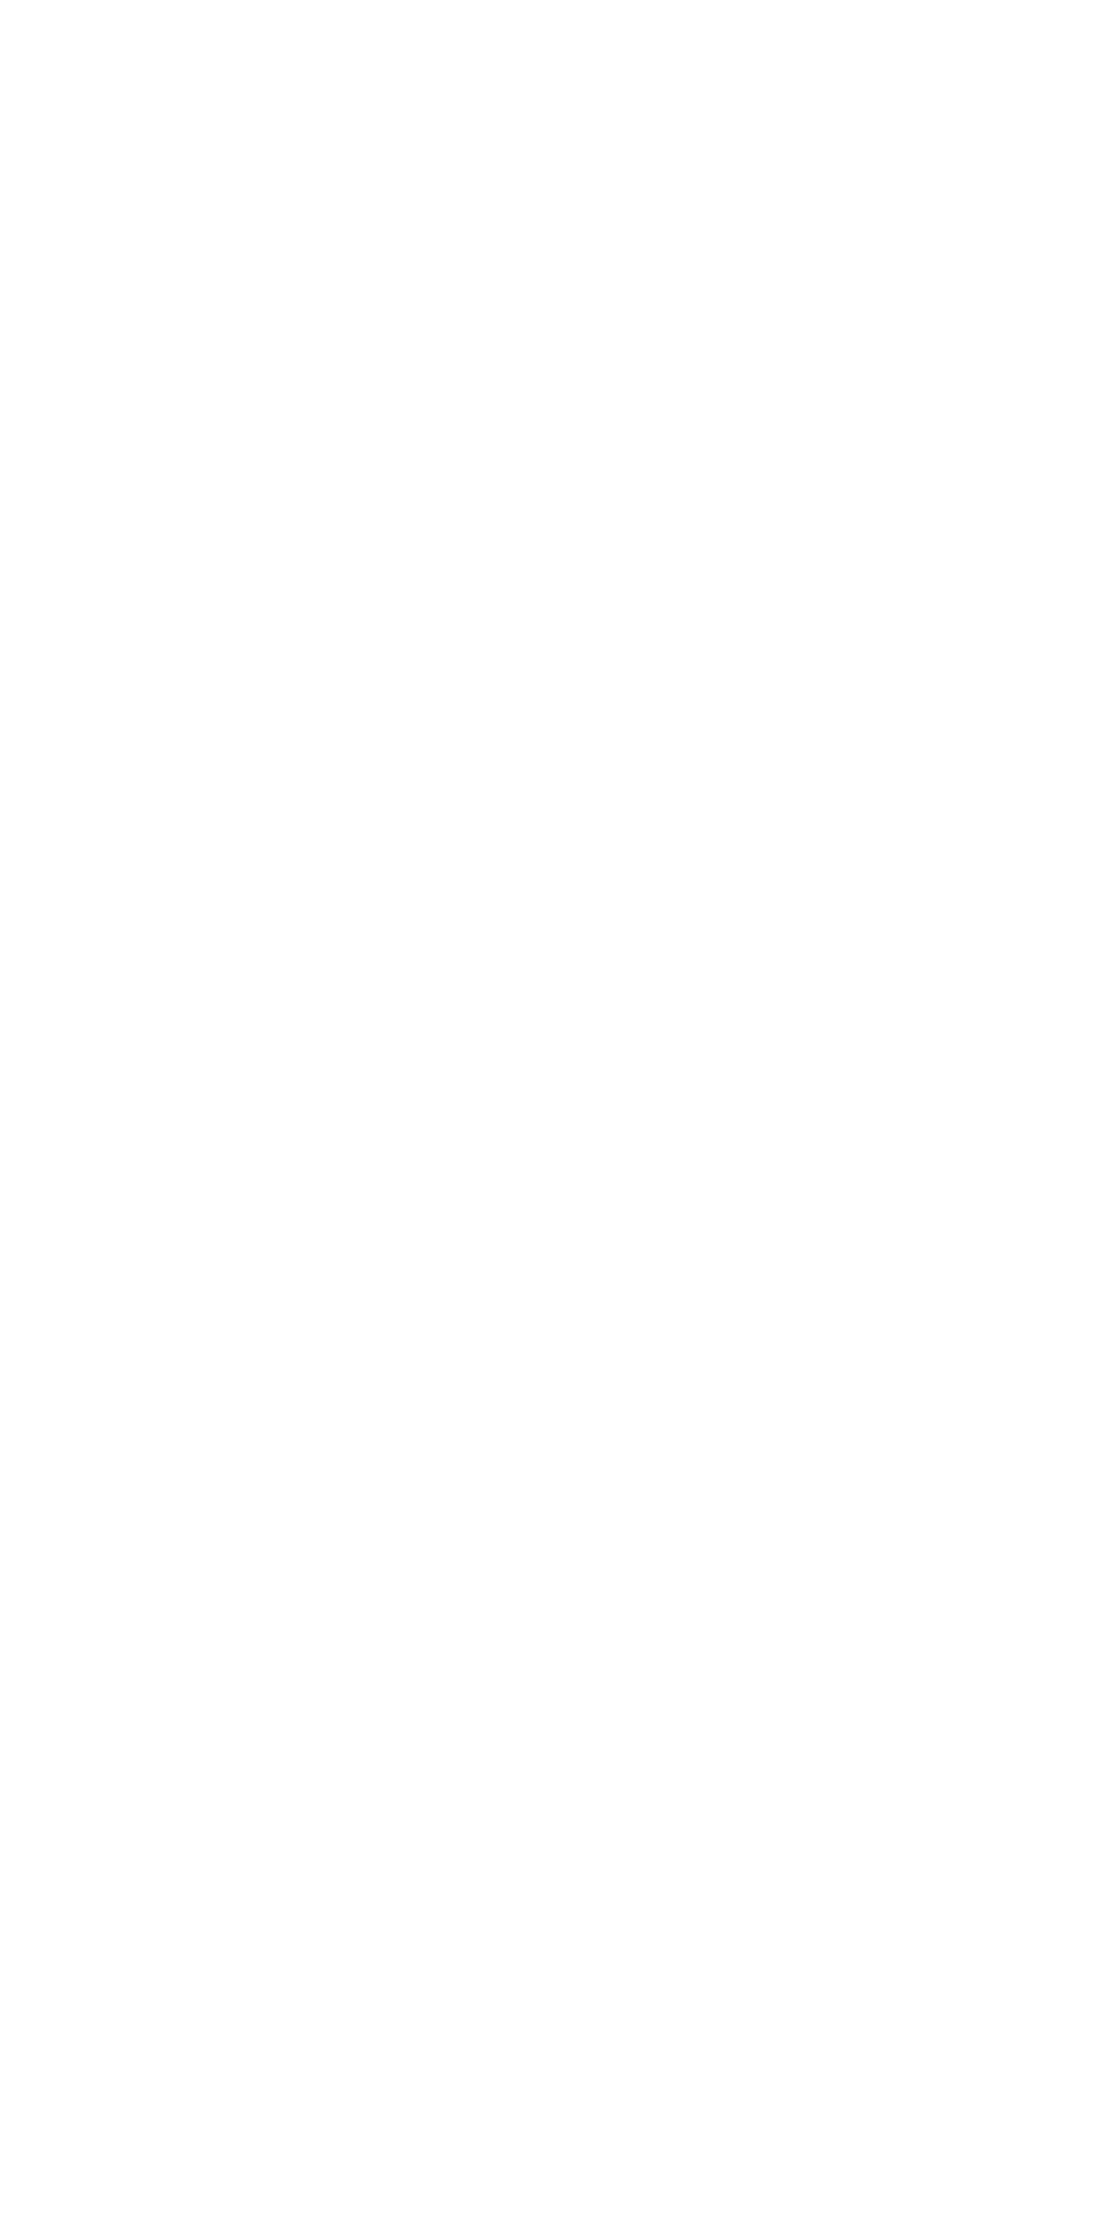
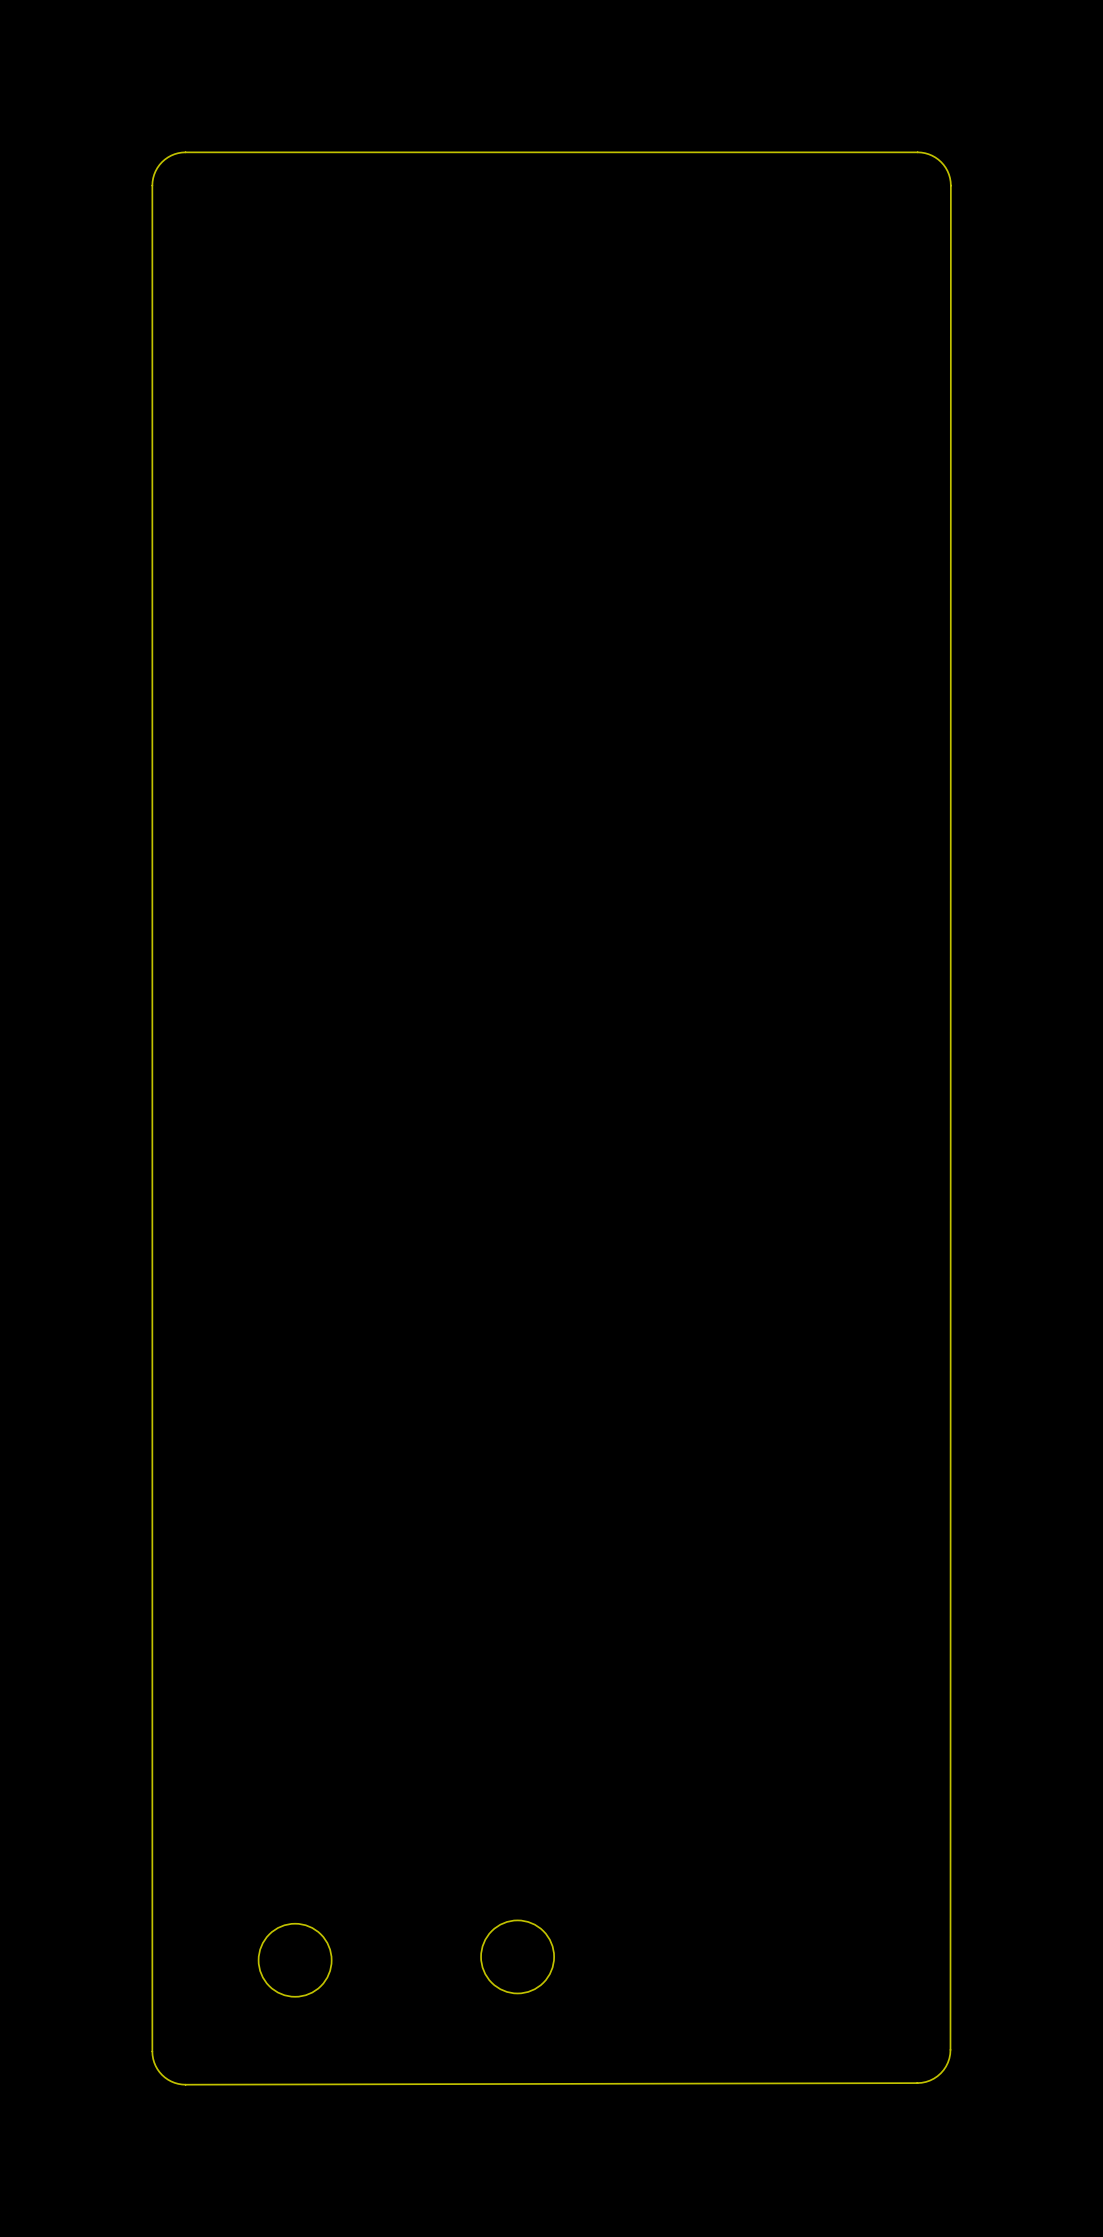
board edge: none -> (185, 152) (917, 152) (928, 154) (938, 159) (949, 174) (950, 185) (950, 2049) (946, 2066) (940, 2073) (930, 2080) (917, 2083) (185, 2084) (174, 2082) (164, 2077) (154, 2062) (152, 2051) (152, 185) (155, 171) (162, 162) (171, 155) (185, 152)
drawing: none -> [480, 1920, 555, 1994]
drawing: none -> [258, 1923, 332, 1997]

